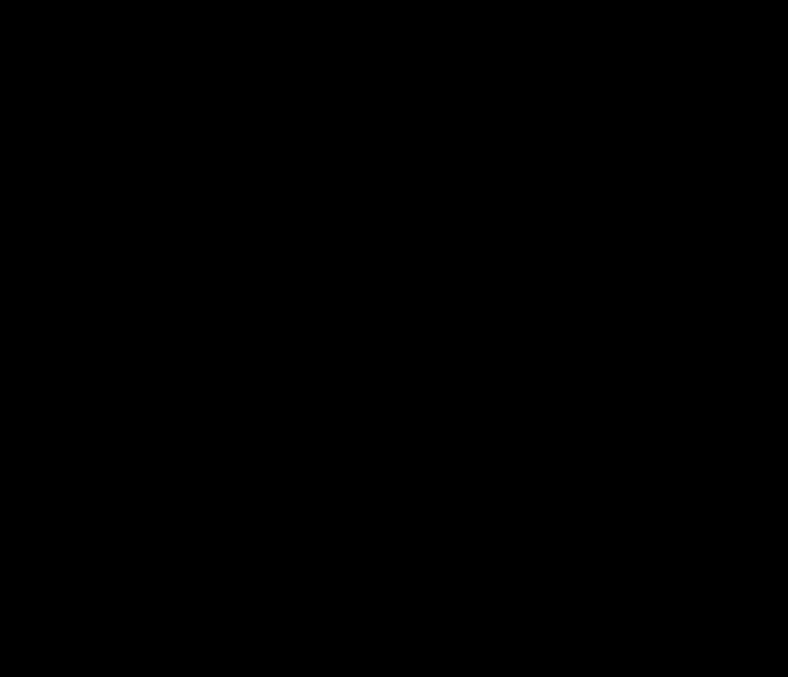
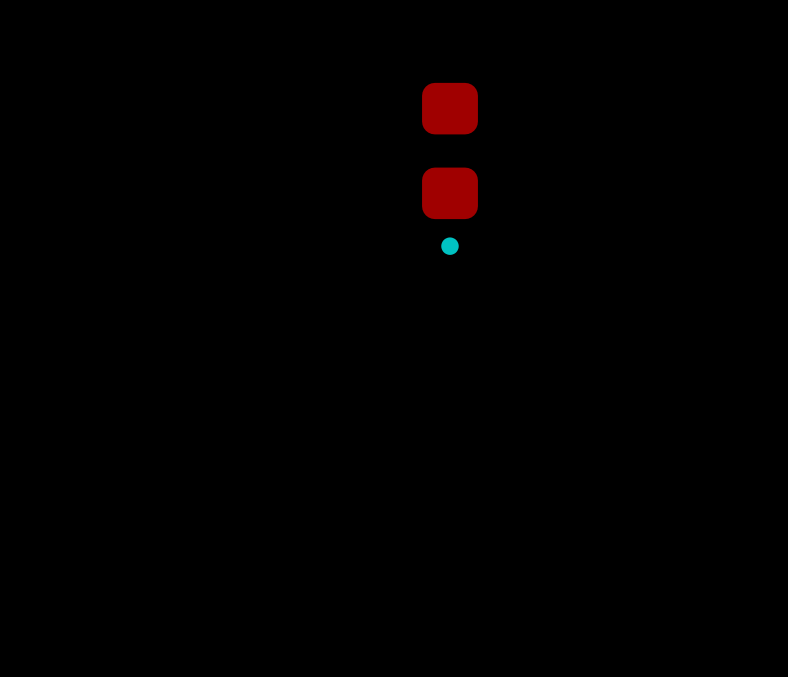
part: none -> (449, 168)

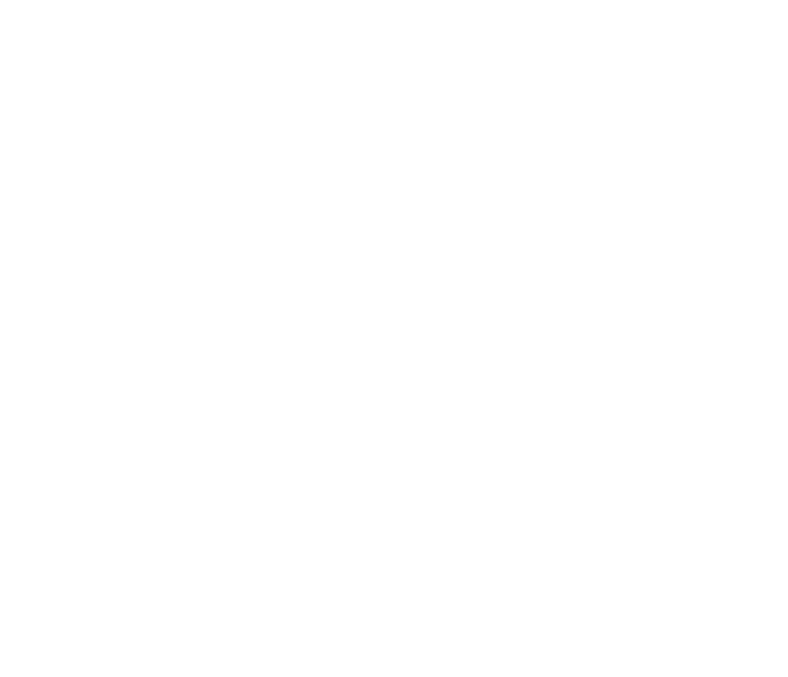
part: (449, 168) -> none

